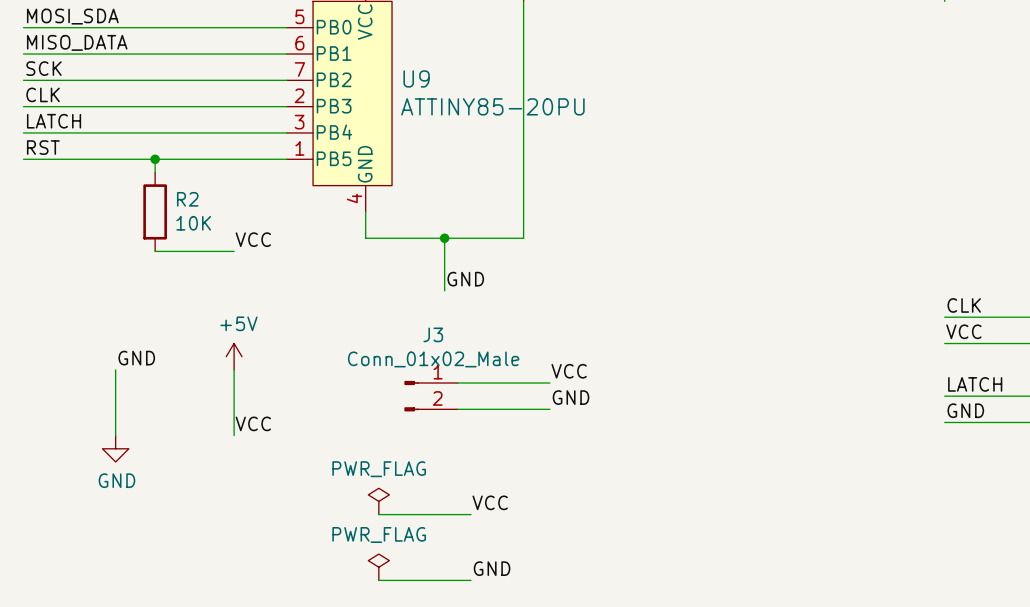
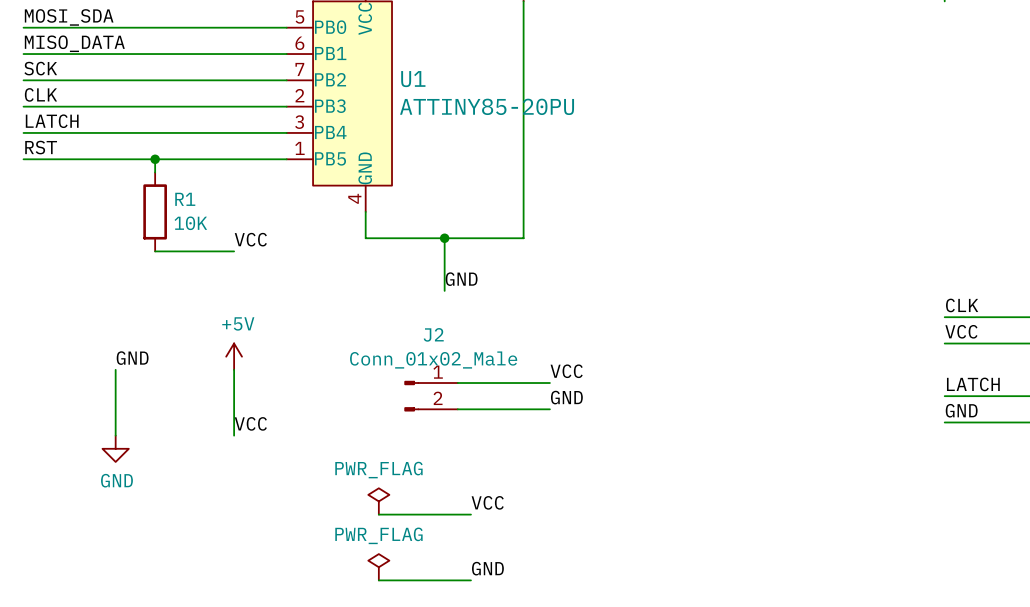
U9 name: U9 (416, 78) -> U1 (413, 79)
R2 name: R2 (187, 199) -> R1 (185, 199)
J3 name: J3 (433, 334) -> J2 (433, 334)

